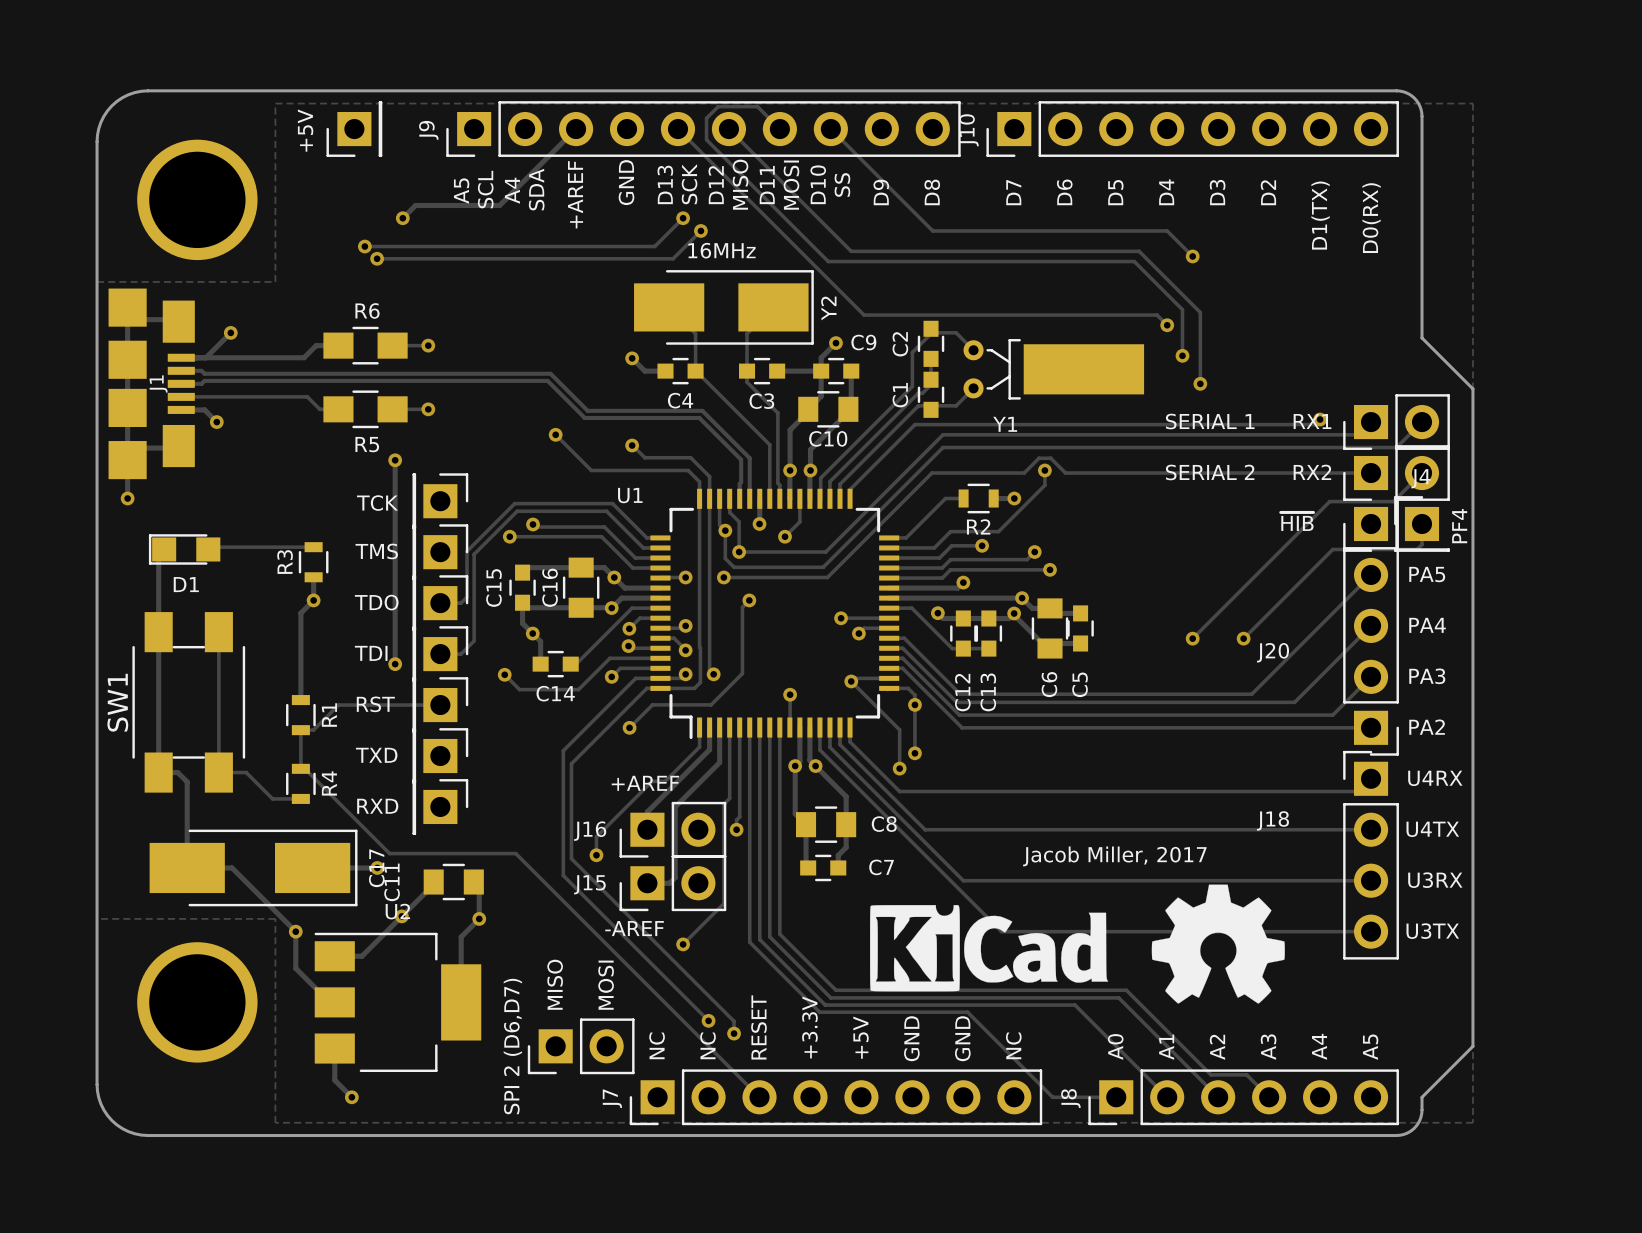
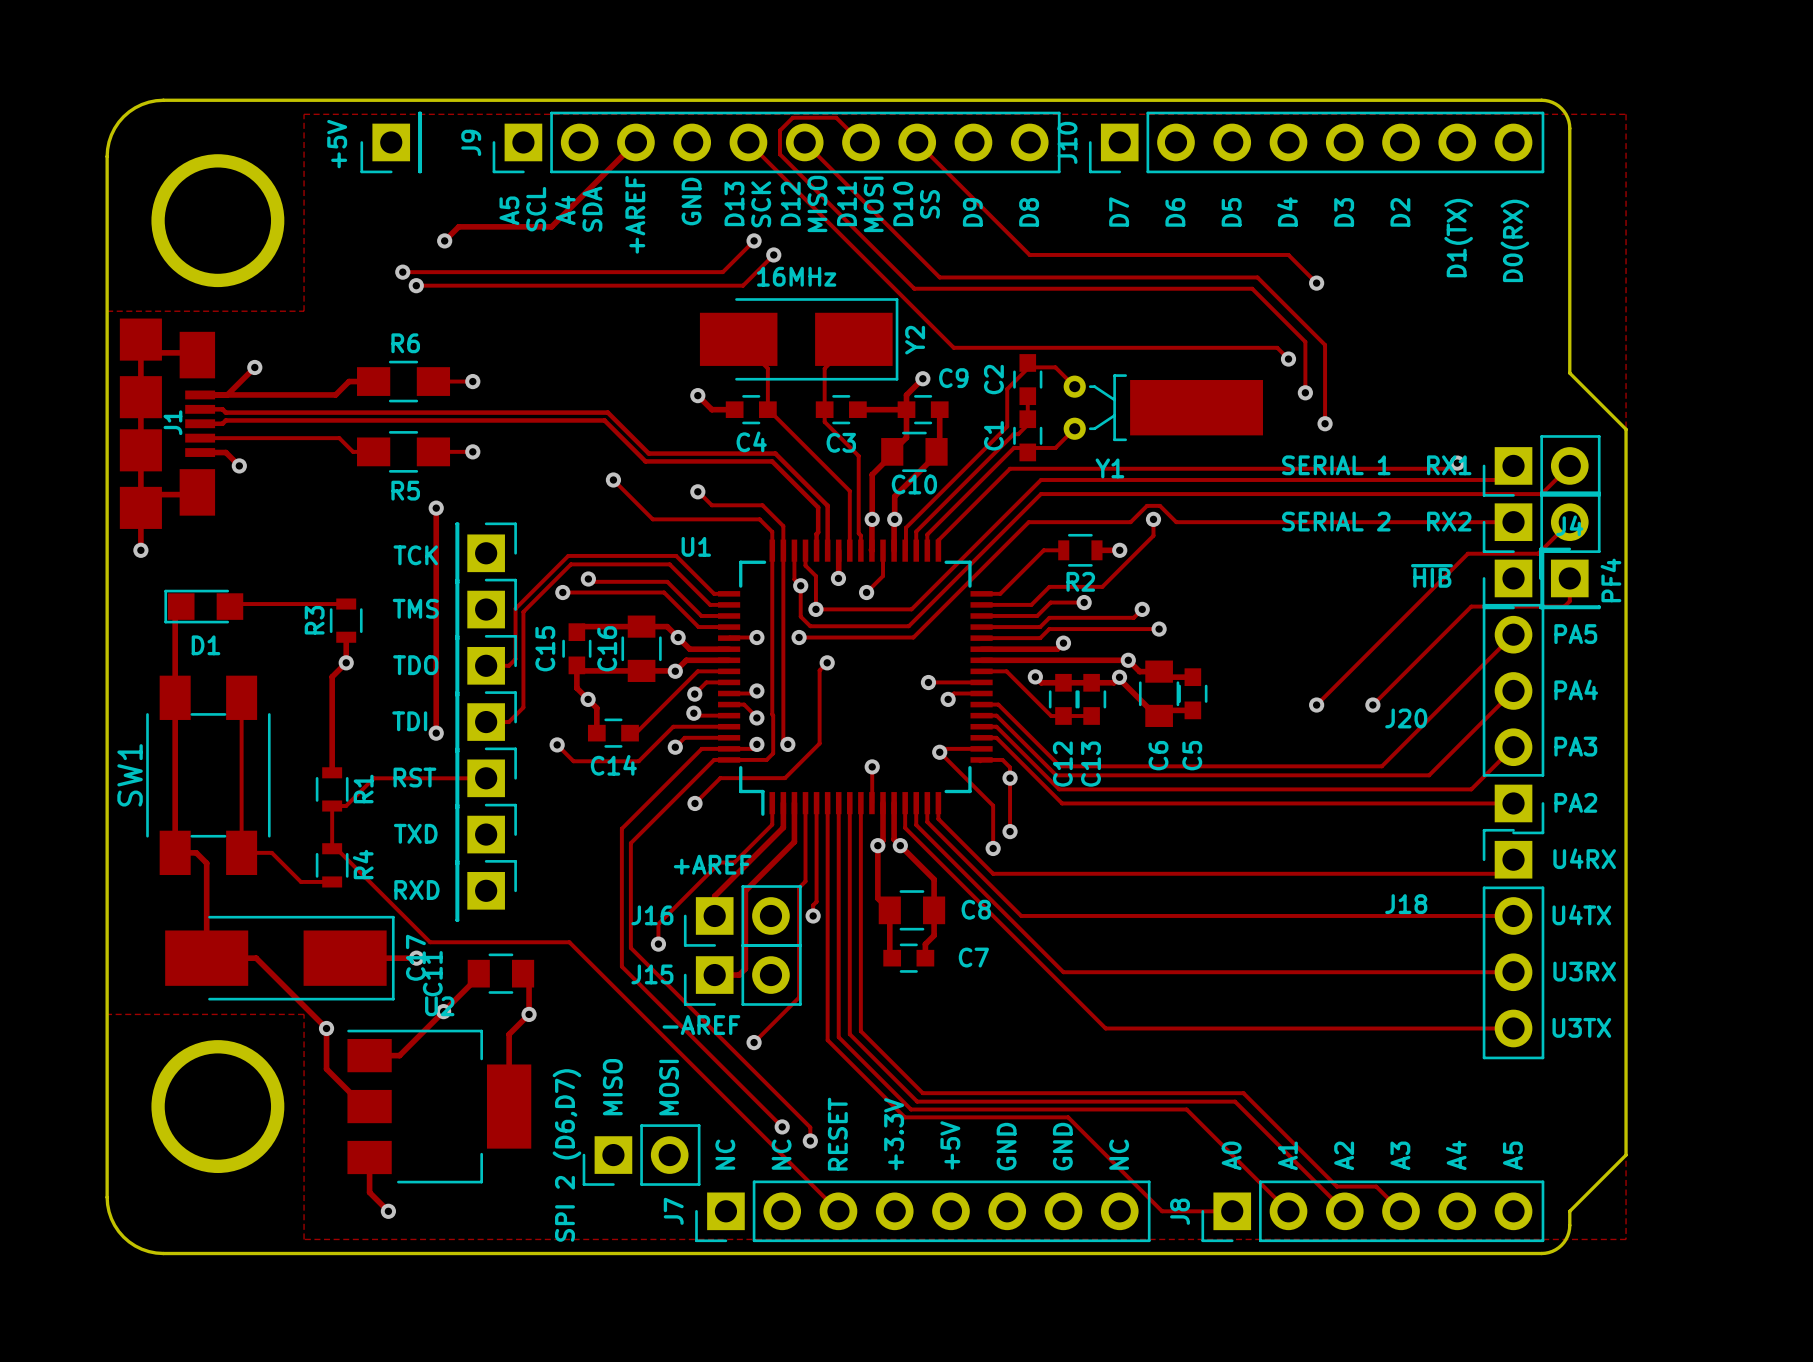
text: Jacob Miller, 2017 (1114, 856) -> none
drawing: [1151, 884, 1285, 1004] -> none
drawing: [870, 905, 1109, 992] -> none

